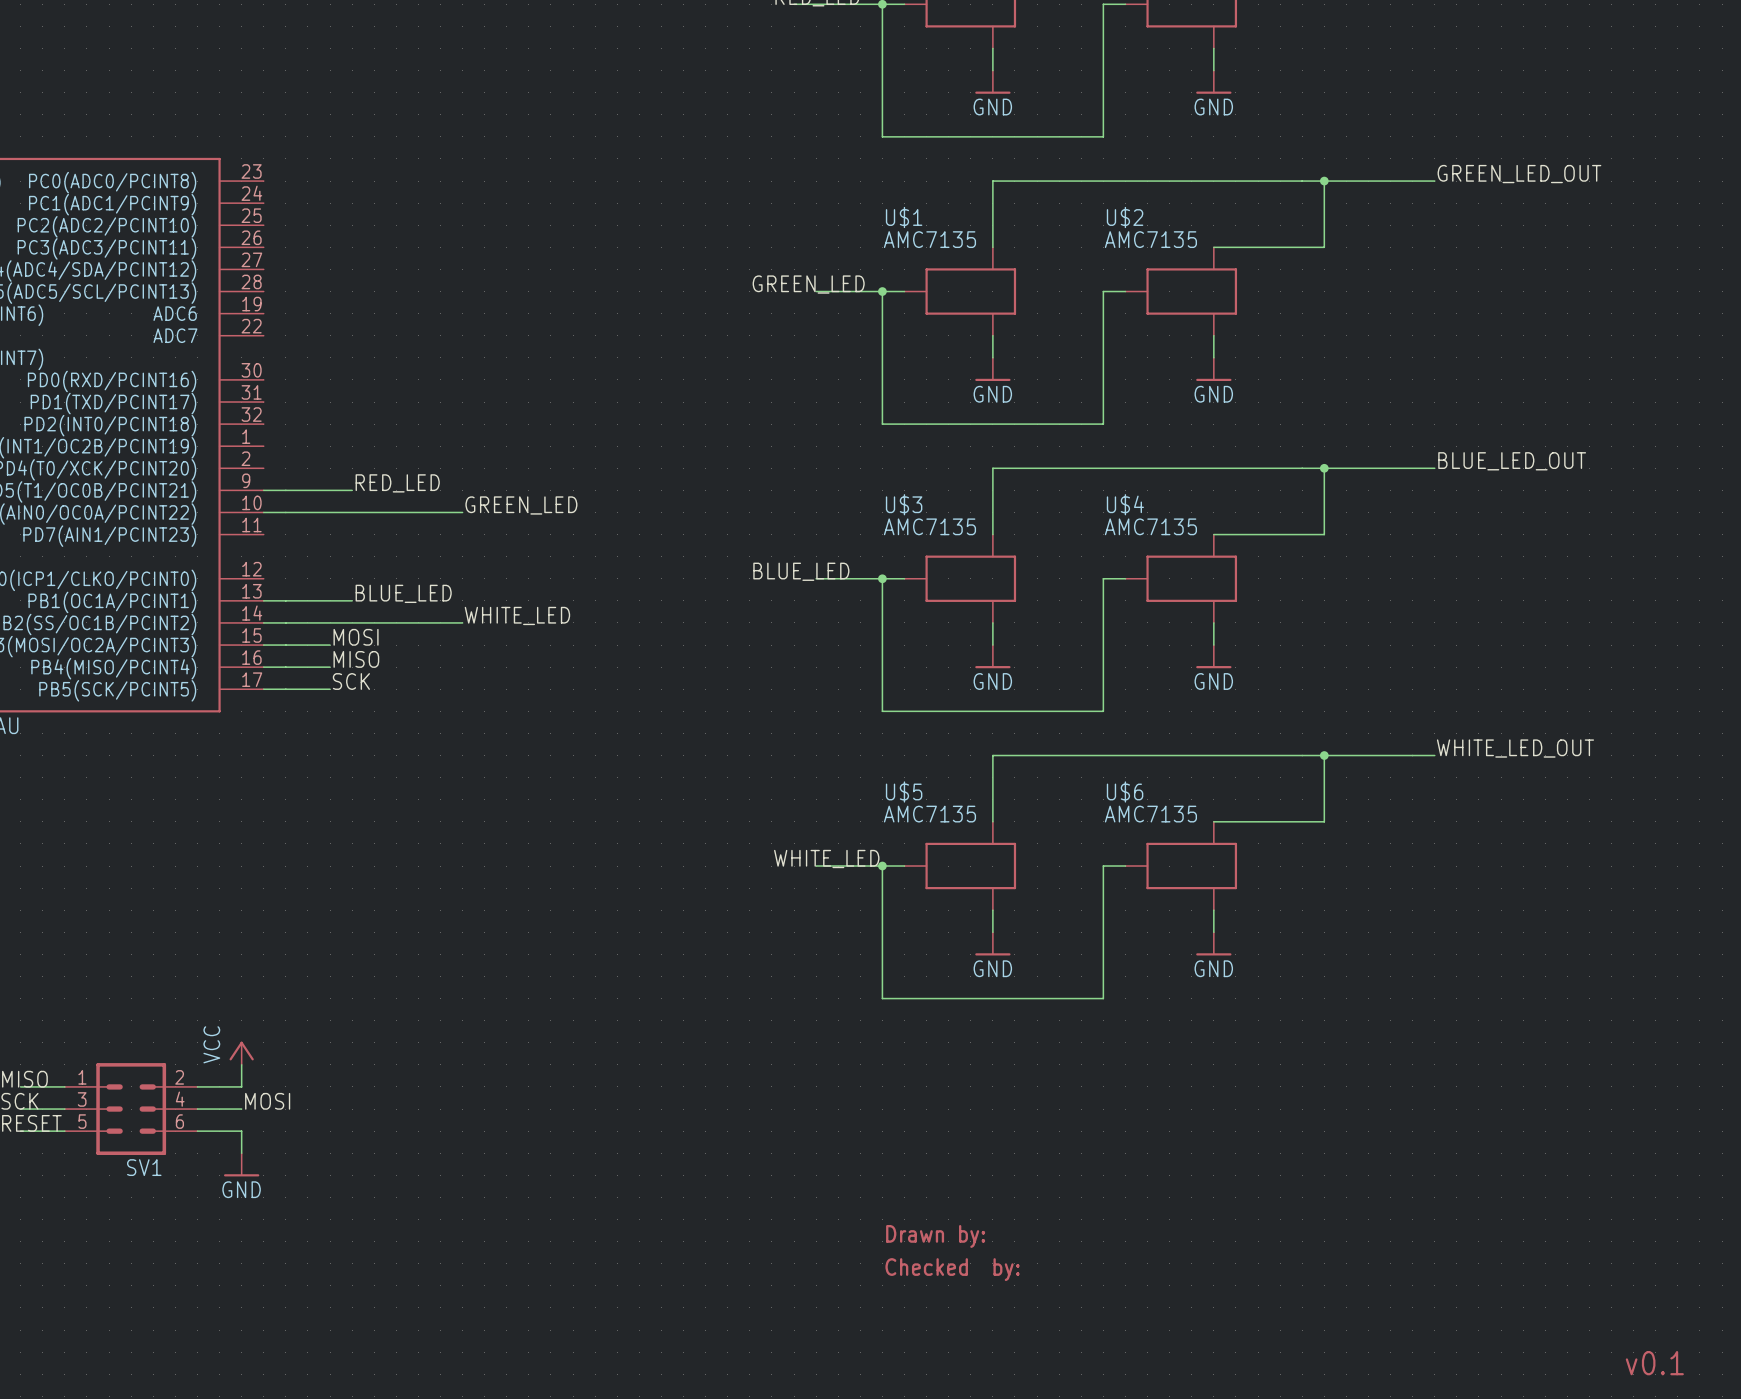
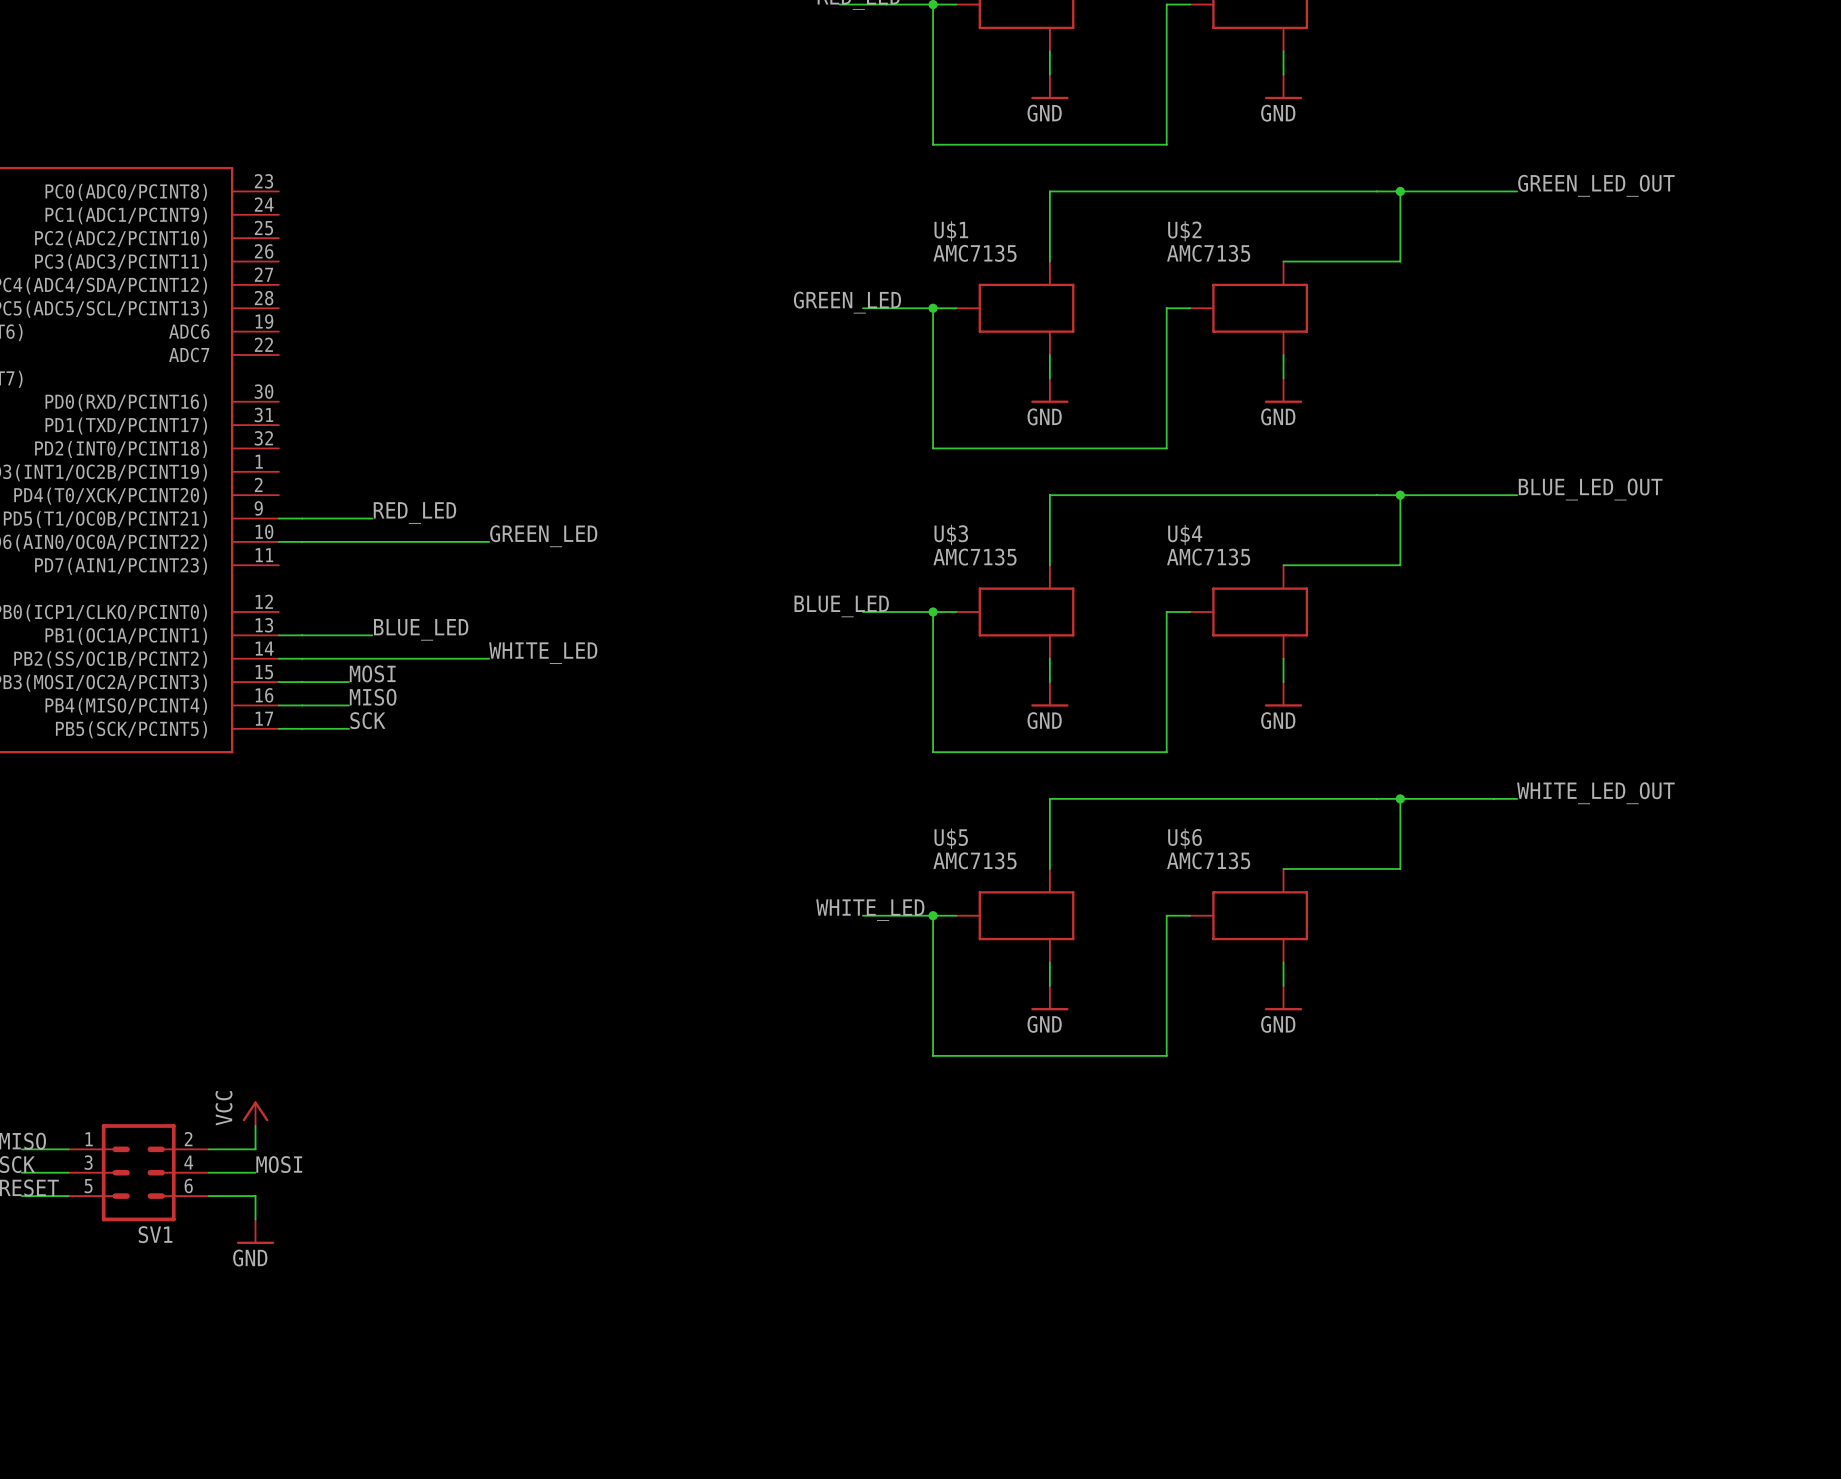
text: Drawn by: (935, 1236) -> none
text: Checked by: (952, 1269) -> none
text: v0.1 (1654, 1363) -> none

